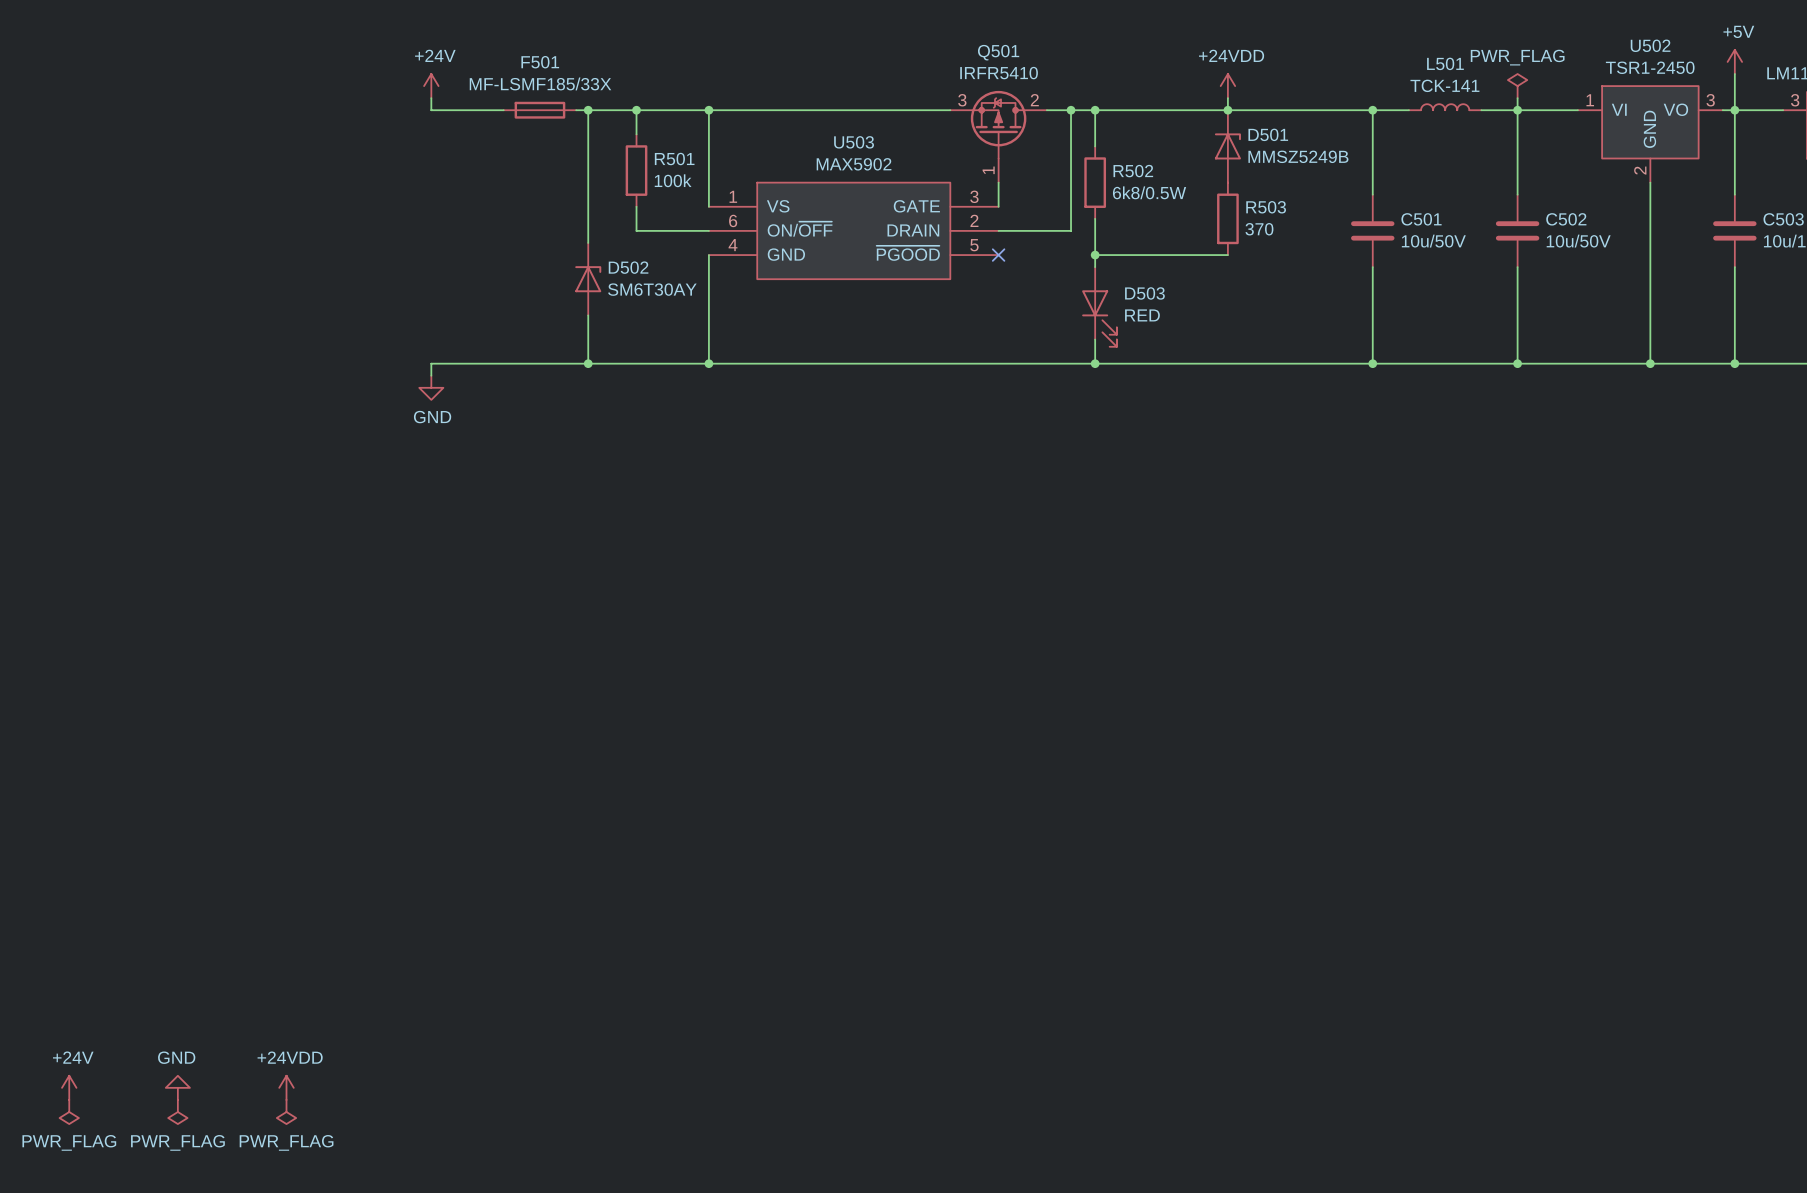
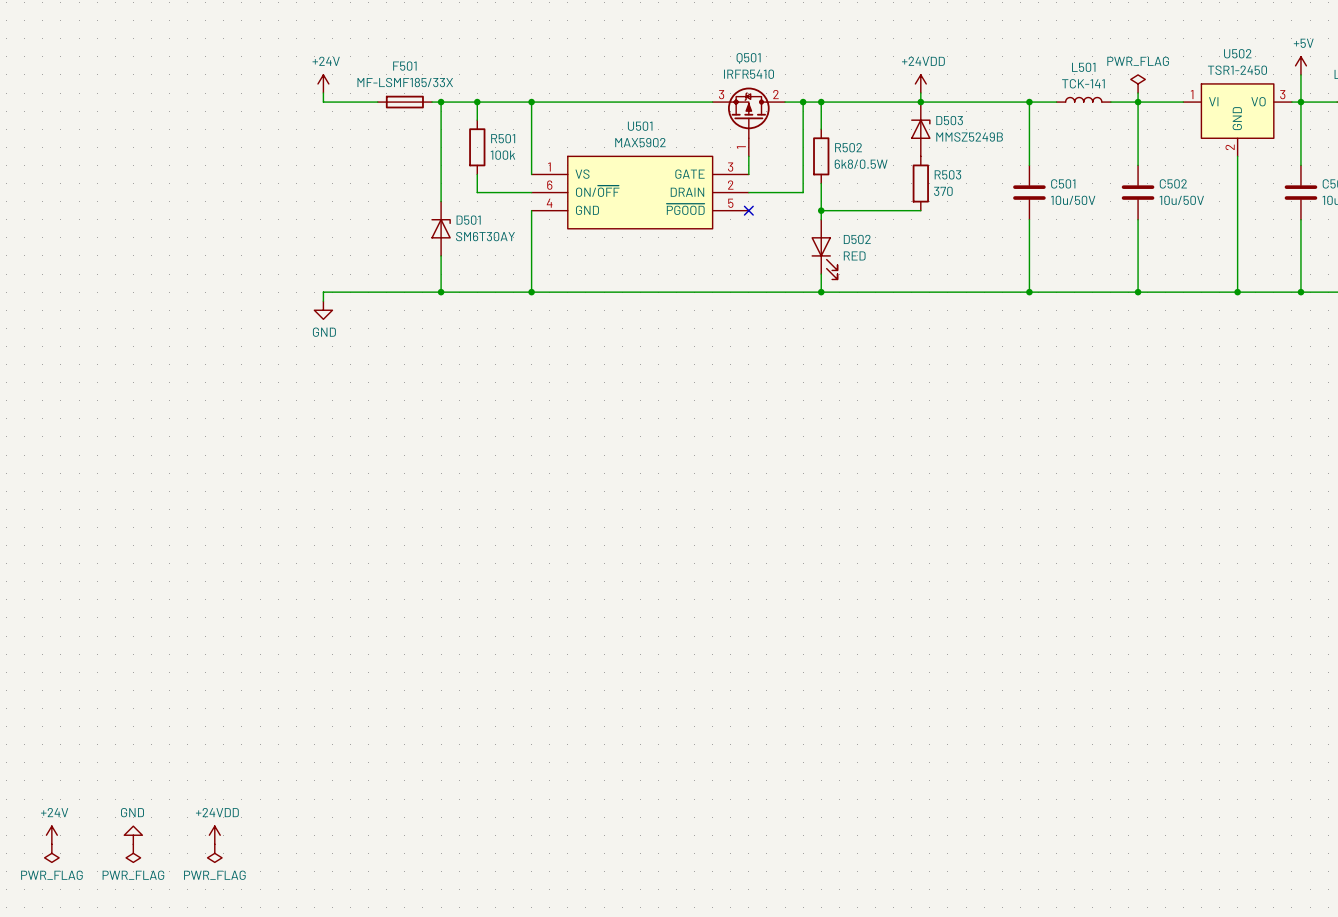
D501 name: D501 (1268, 134) -> D503 (949, 120)
U503 name: U503 (854, 142) -> U501 (640, 126)
D502 name: D502 (628, 267) -> D501 (468, 220)
D503 name: D503 (1144, 293) -> D502 (857, 239)

